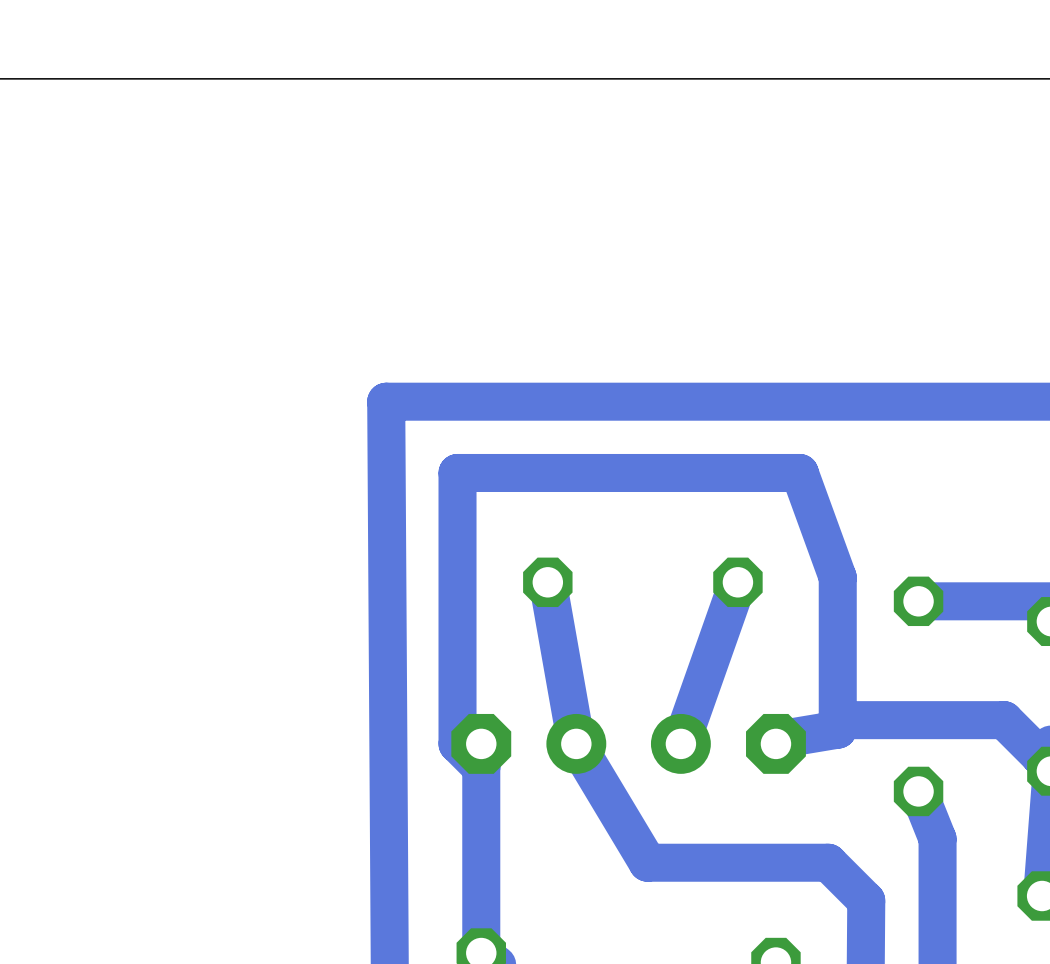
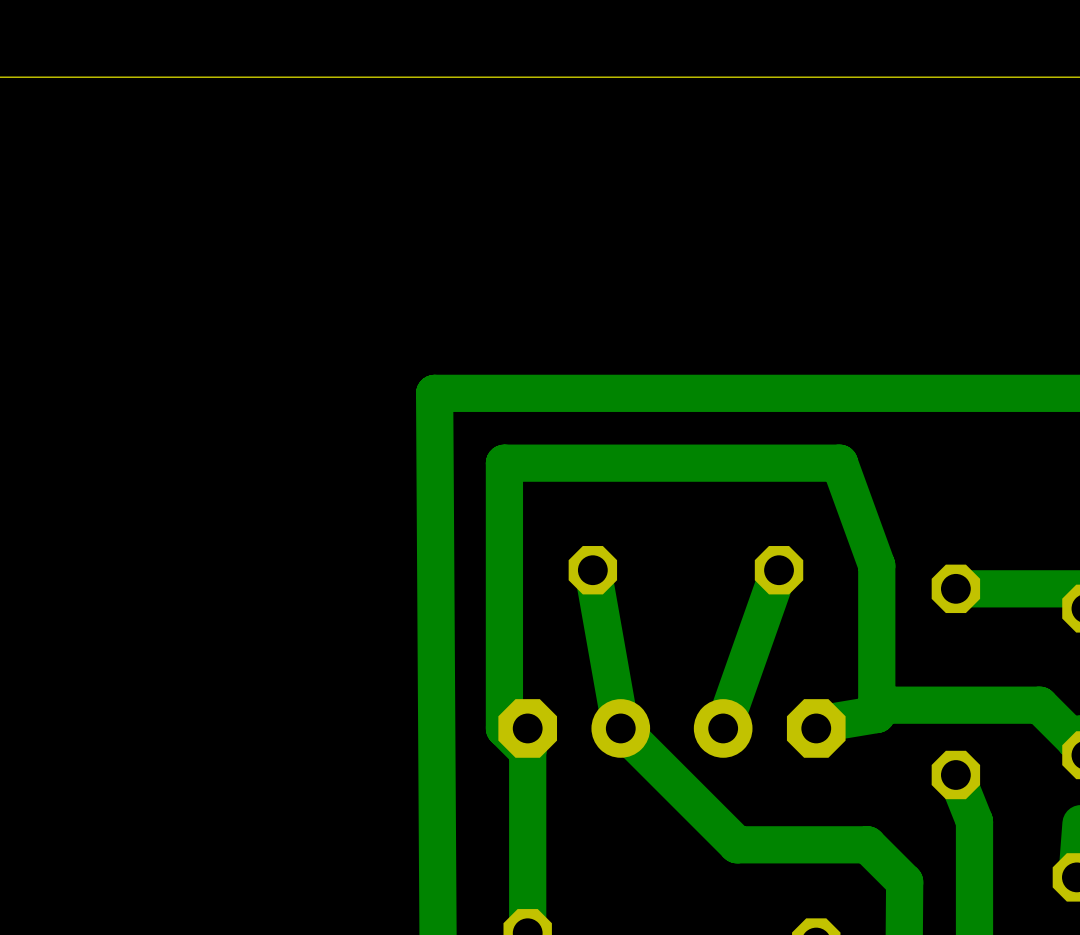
bottom track: (576, 743) (647, 862) (695, 862) -> (620, 728) (737, 844)

